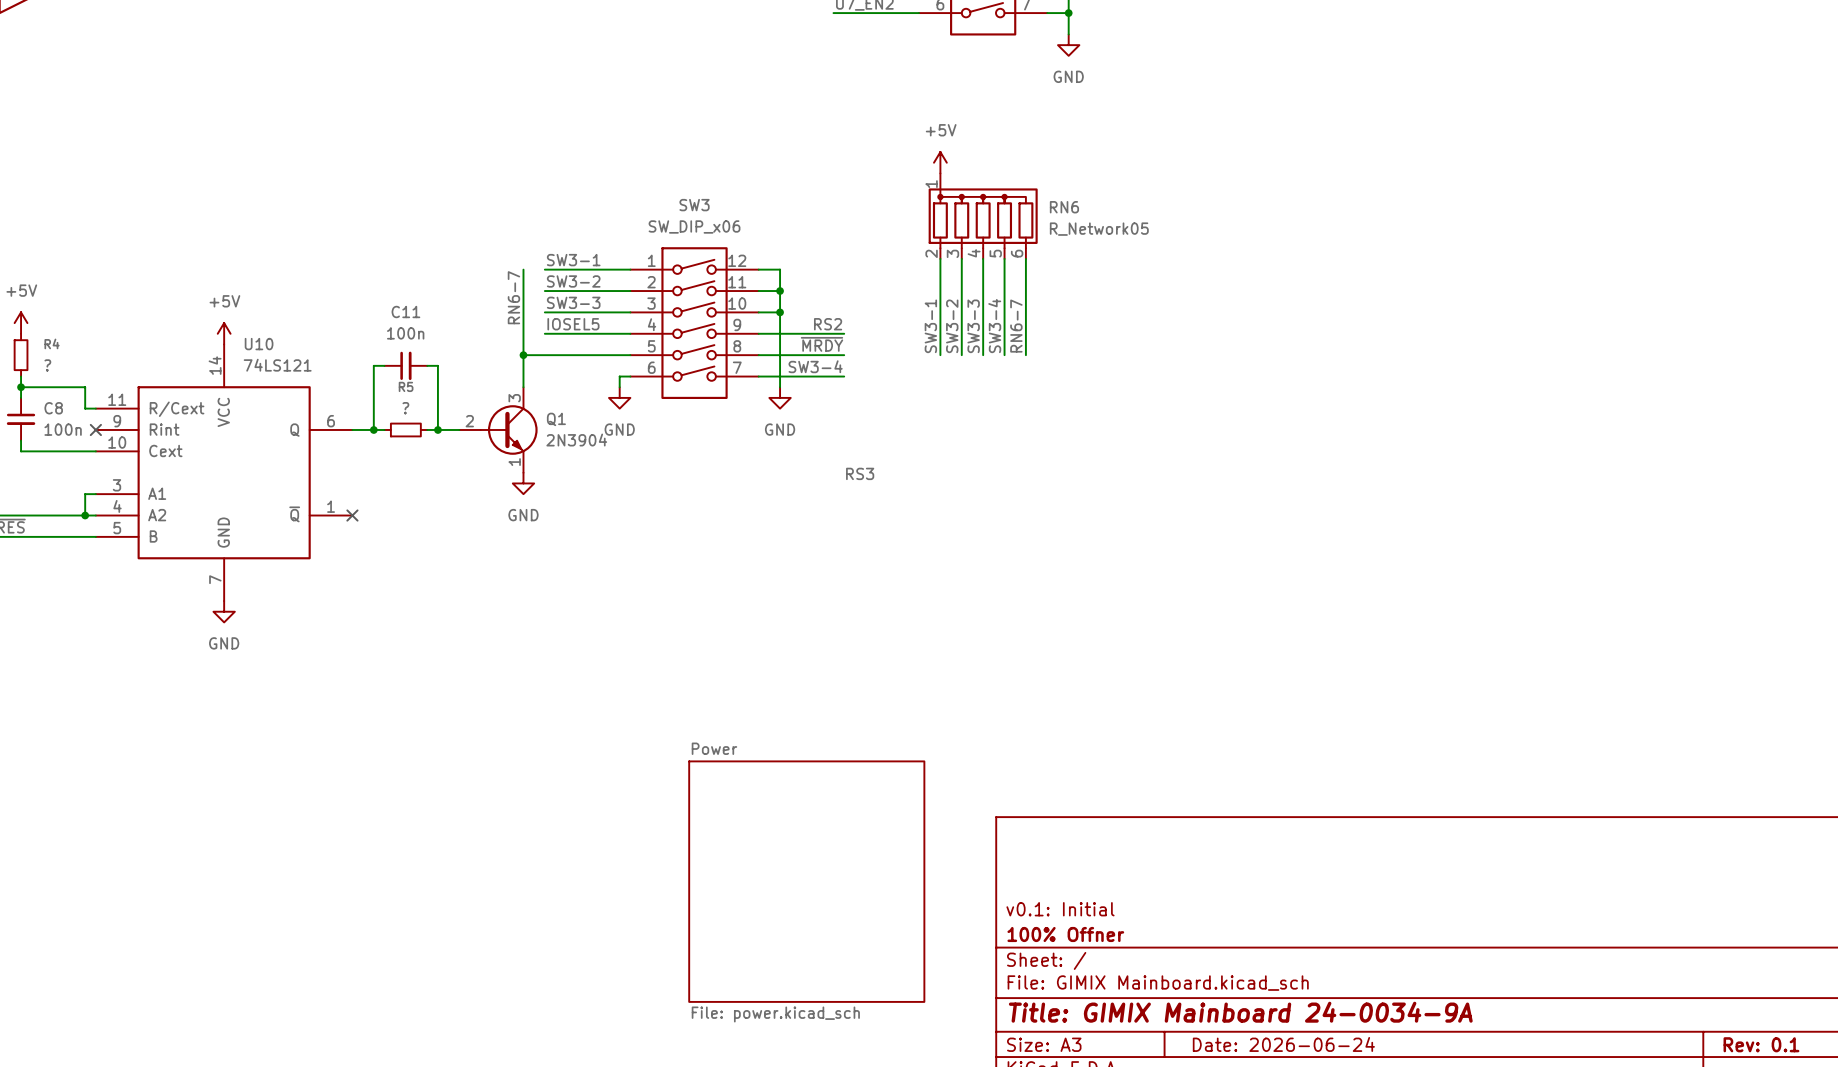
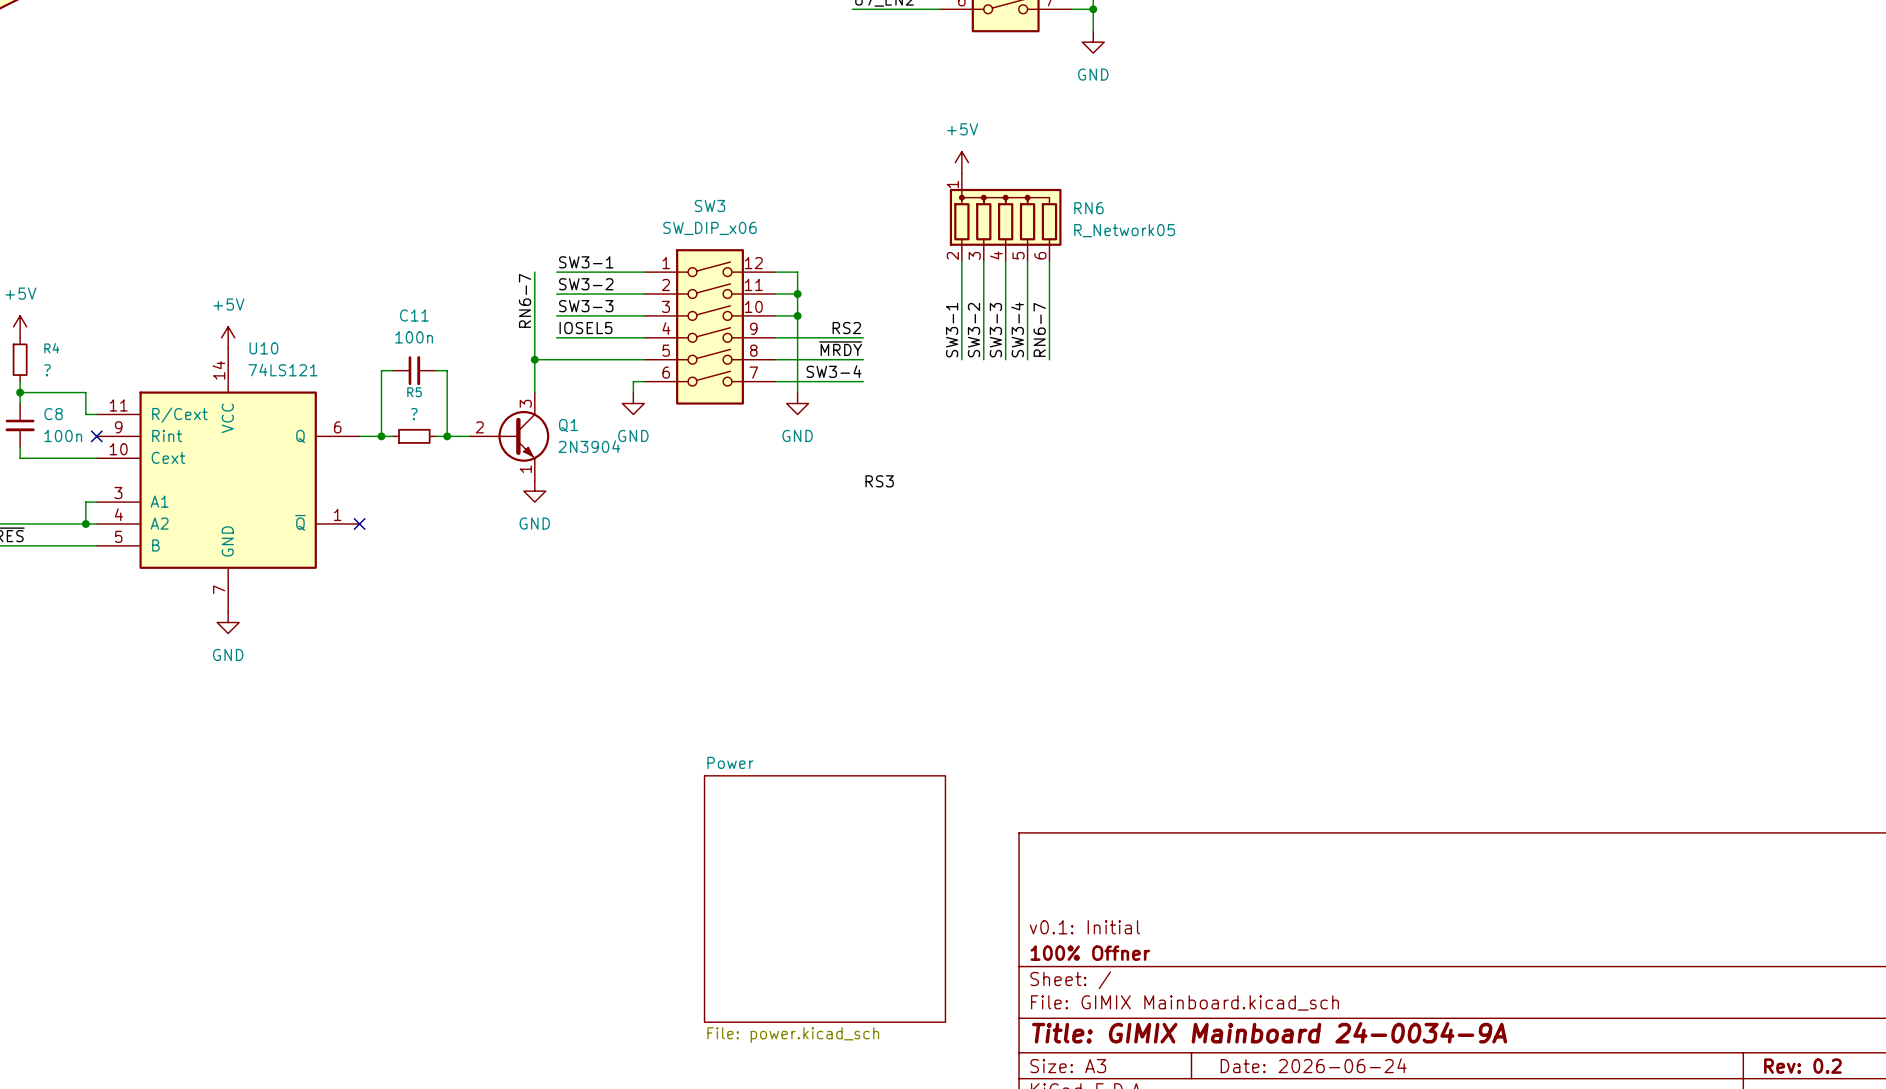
title block: Rev: 0.1 (1761, 1044) -> Rev: 0.2 (1802, 1066)

